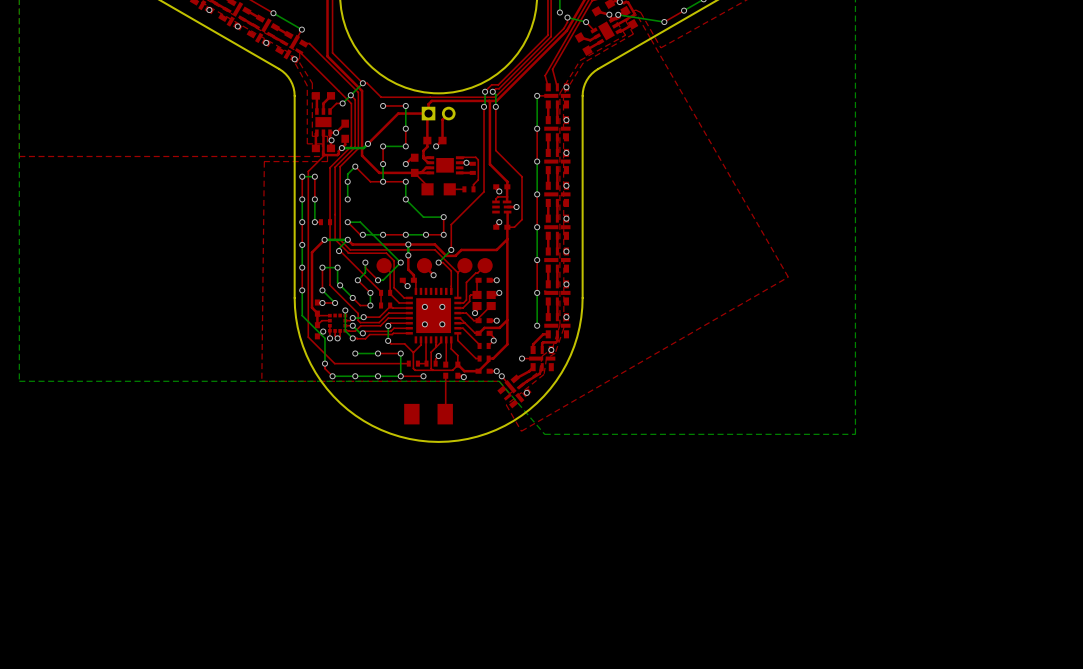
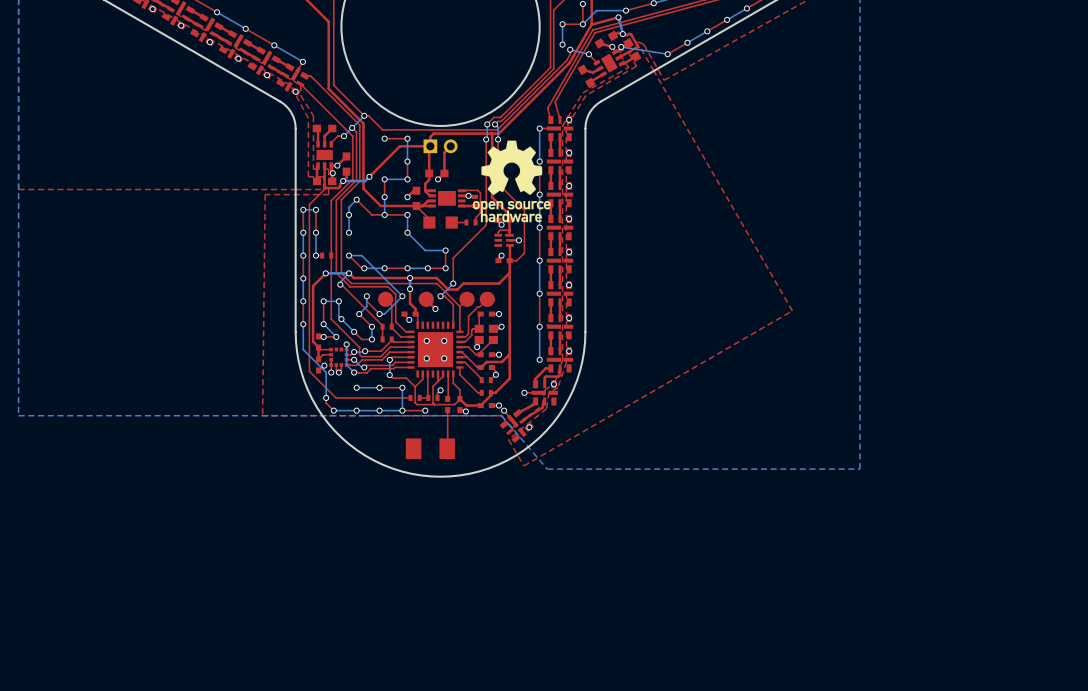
drawing: none -> [472, 140, 551, 223]

